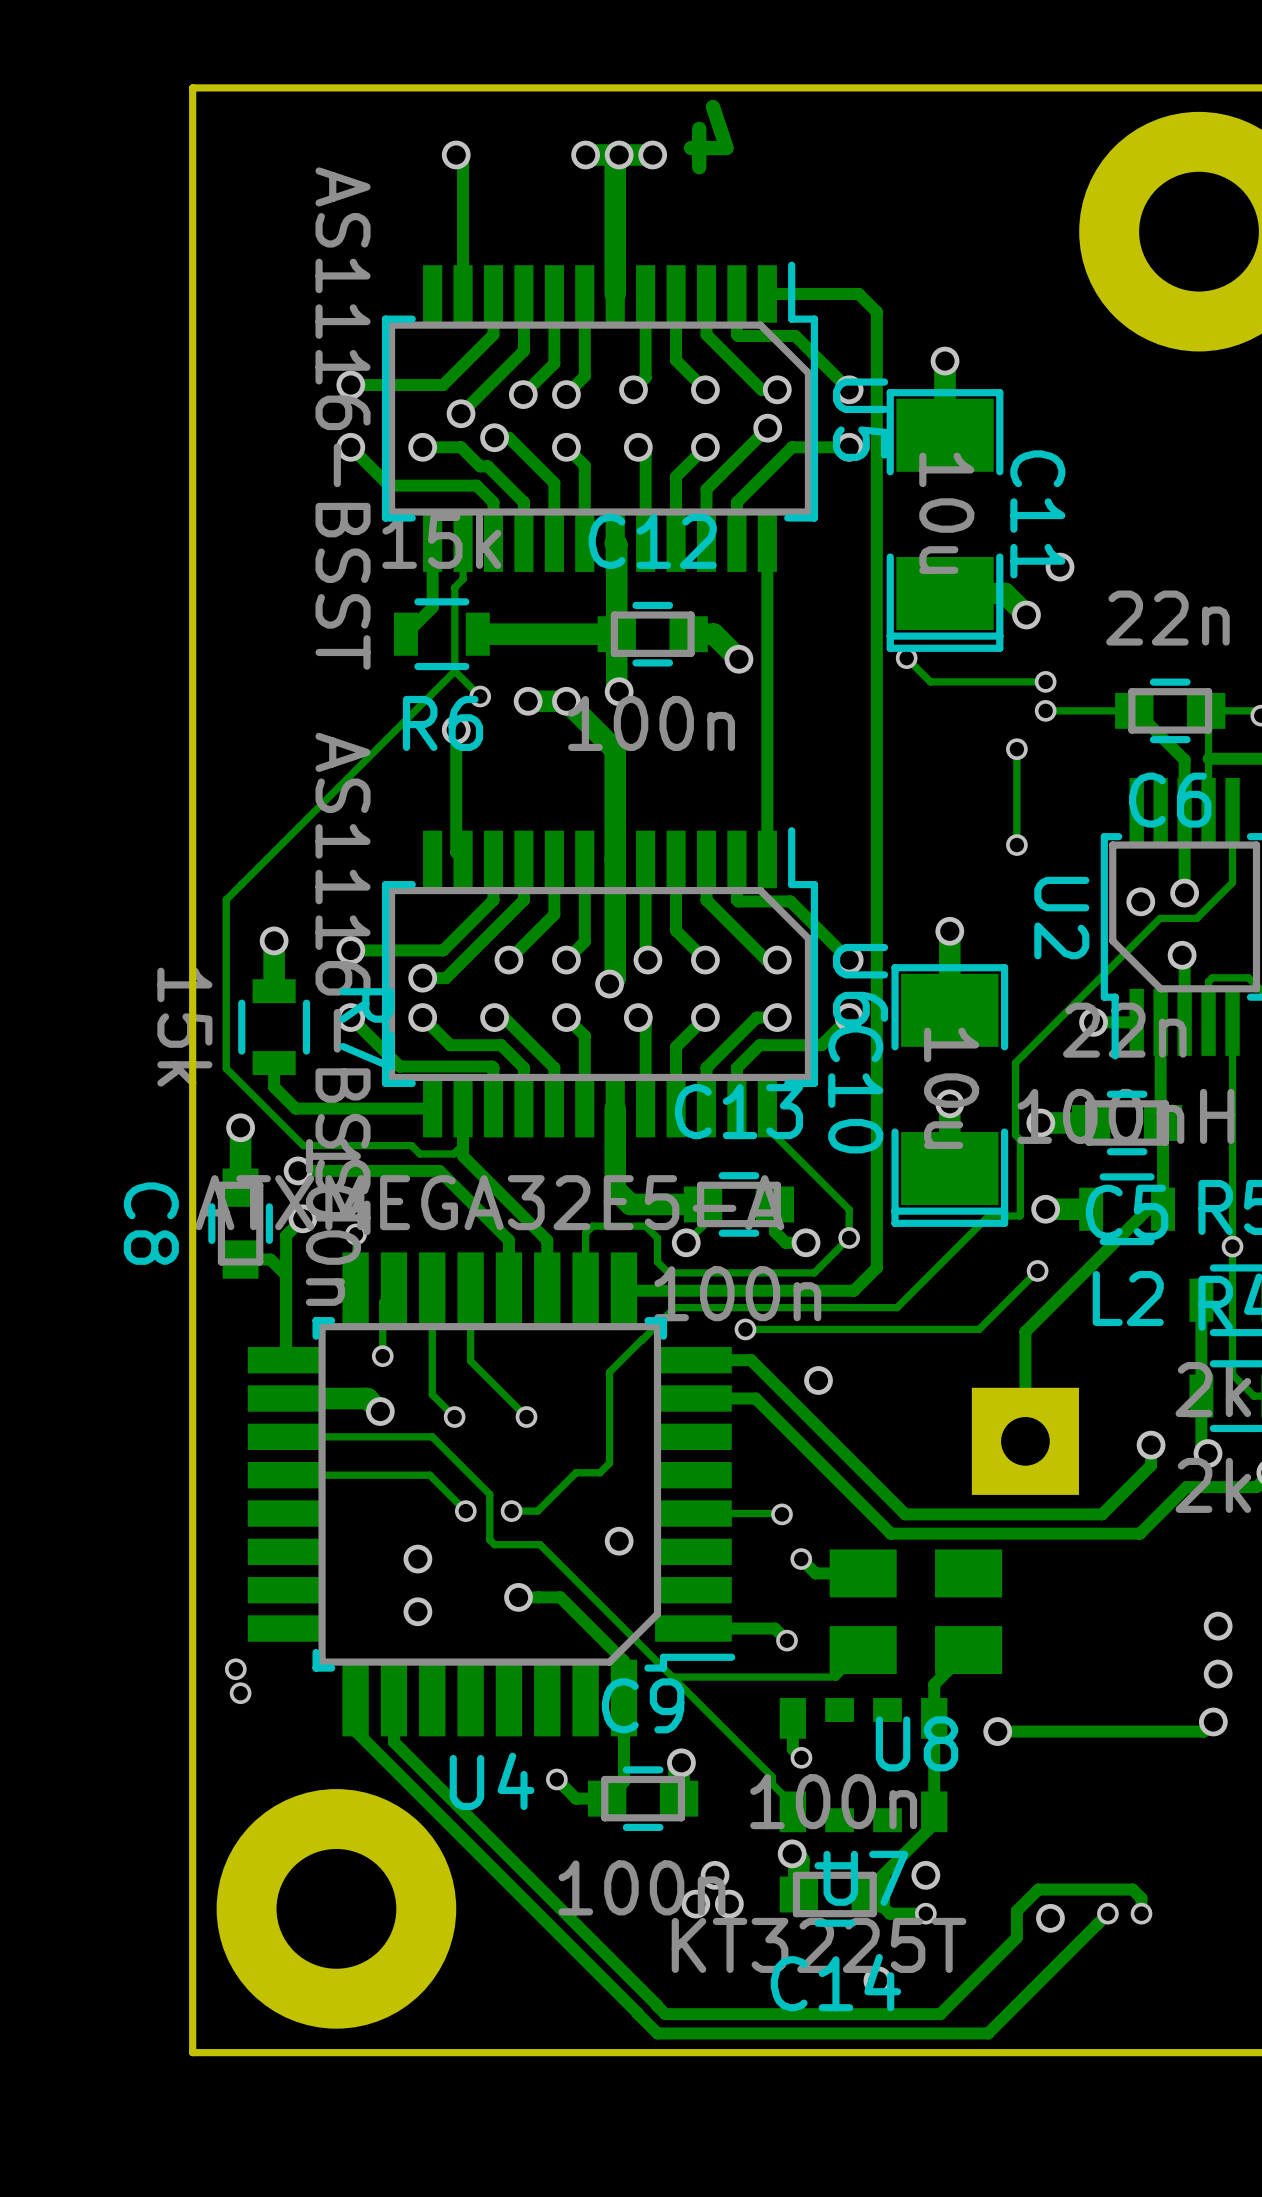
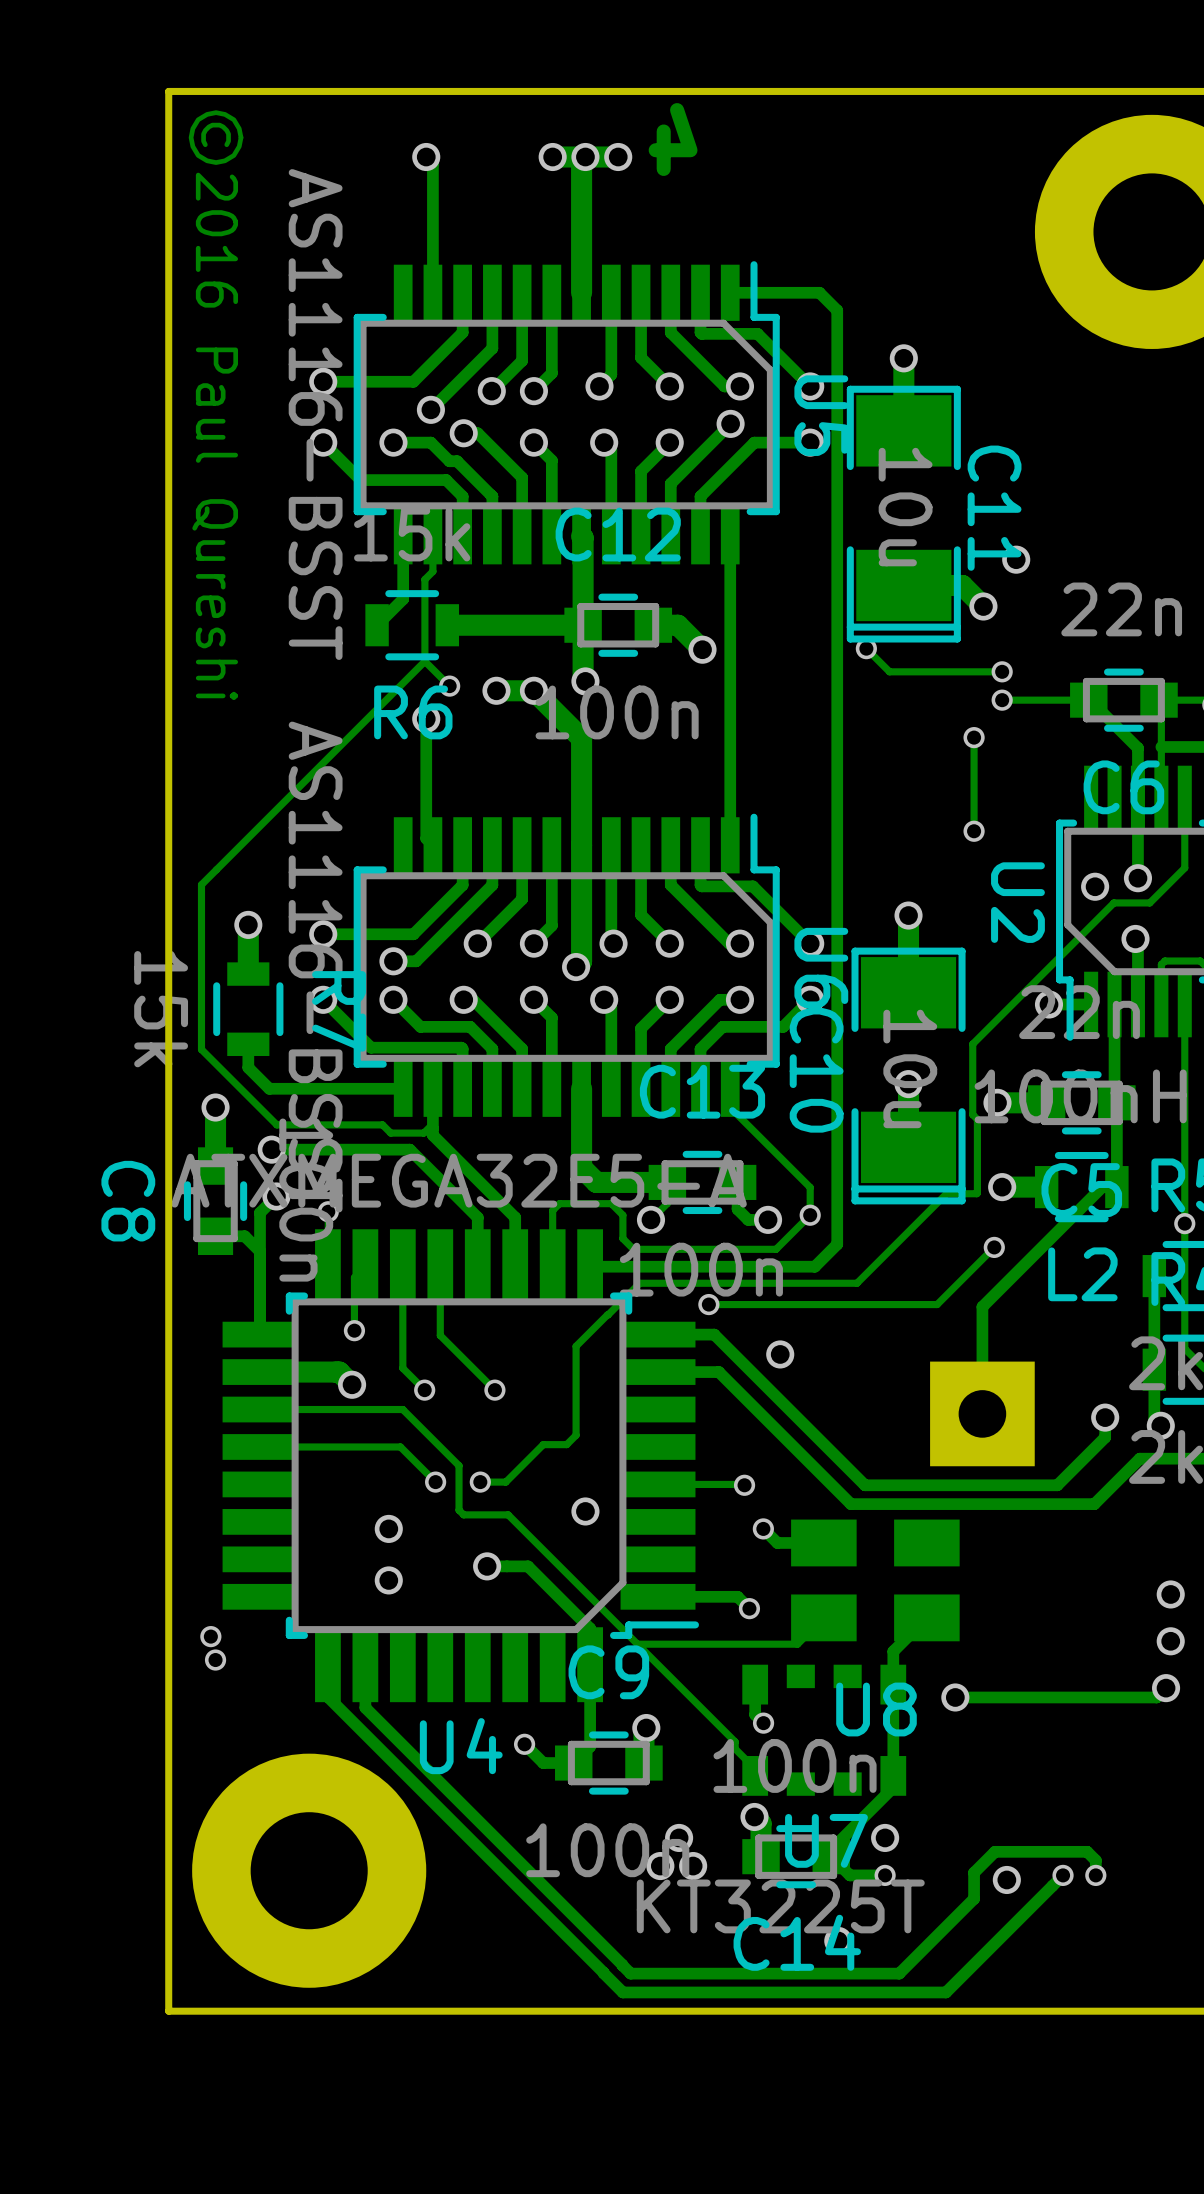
text: none -> ©2016 Paul Qureshi (216, 405)

